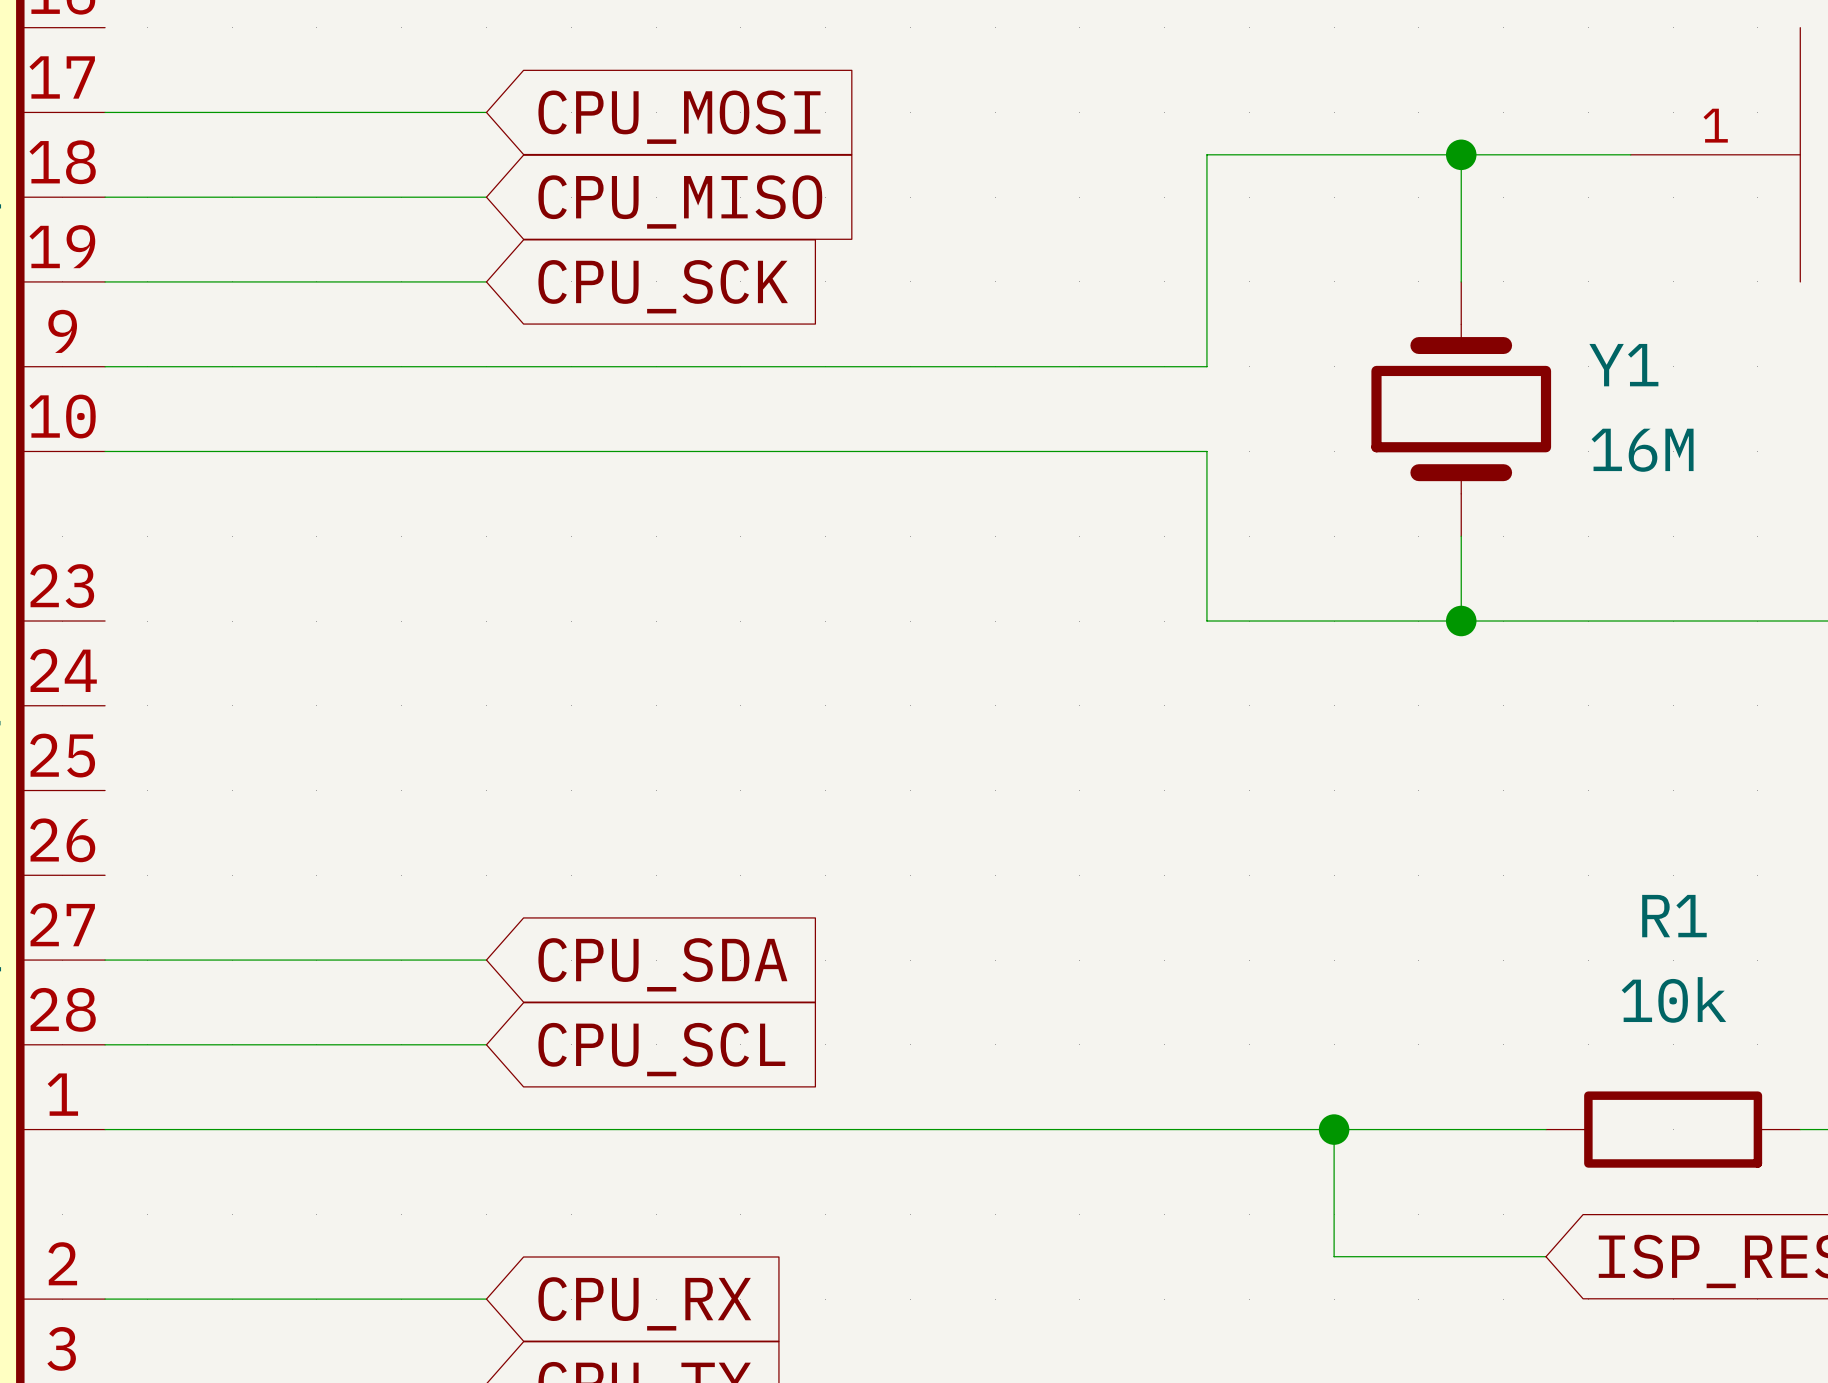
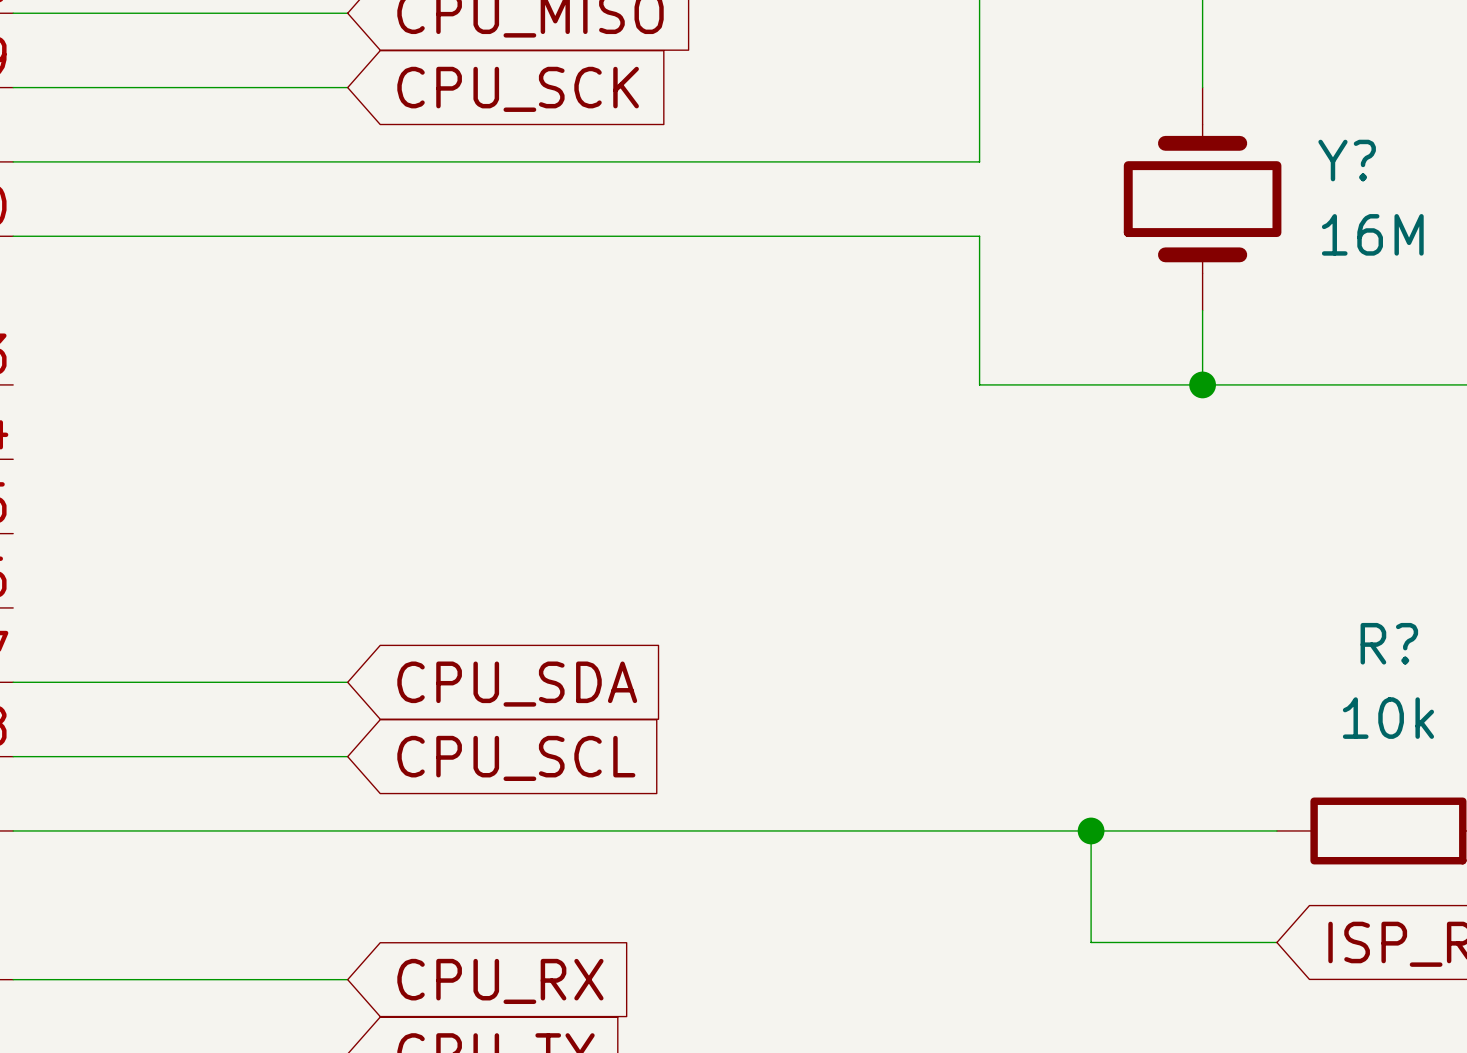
Y1 name: Y1 (1623, 365) -> Y? (1347, 160)
R1 name: R1 (1674, 916) -> R? (1389, 643)

